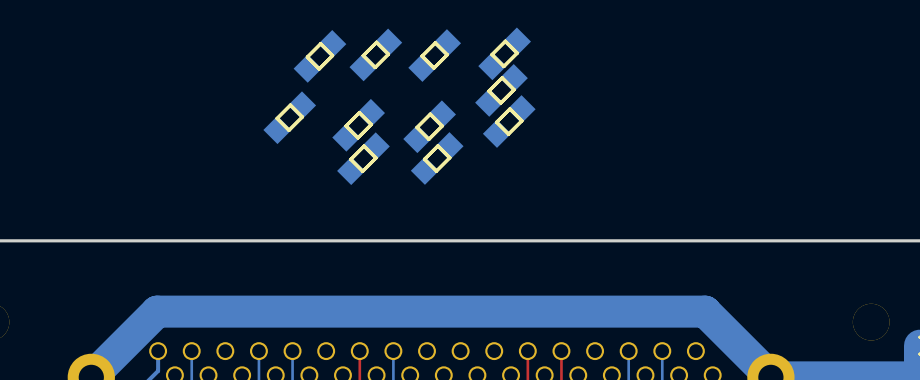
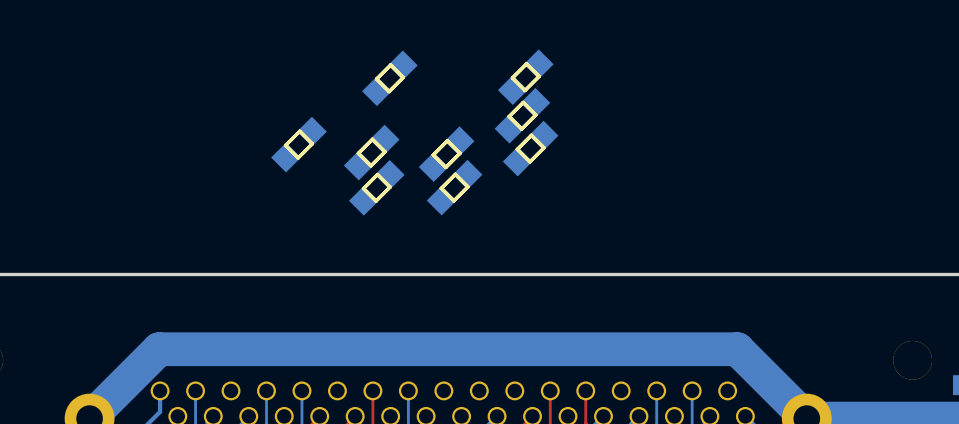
part: (434, 55) -> none
part: (319, 56) -> none

